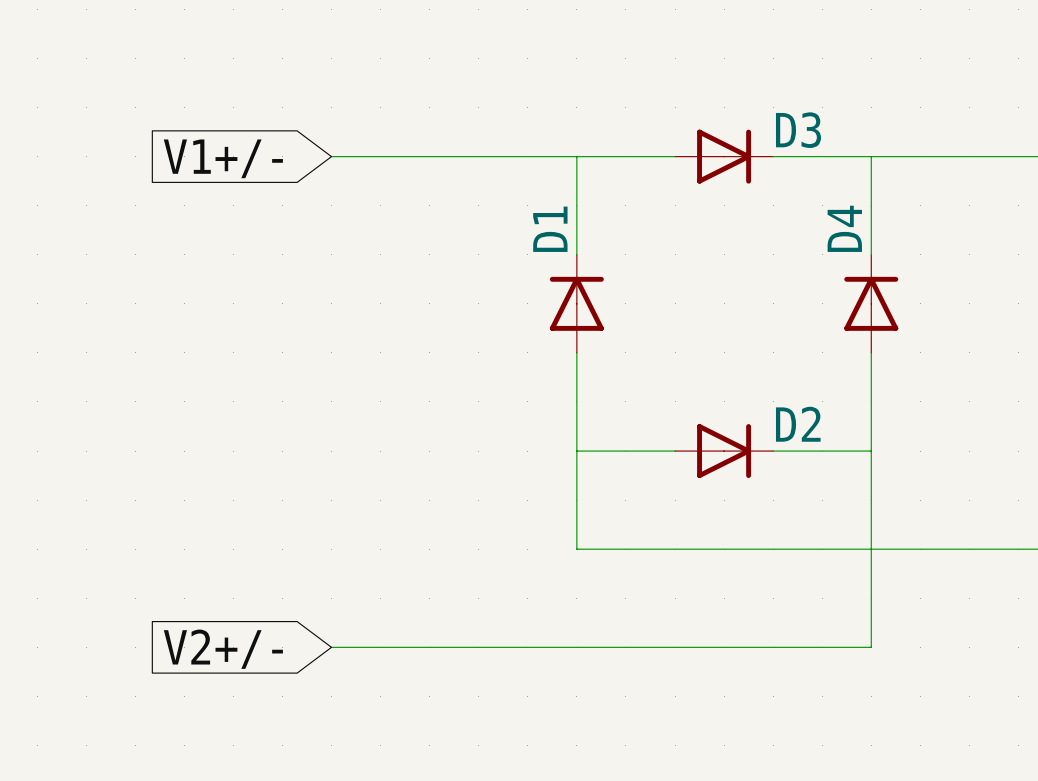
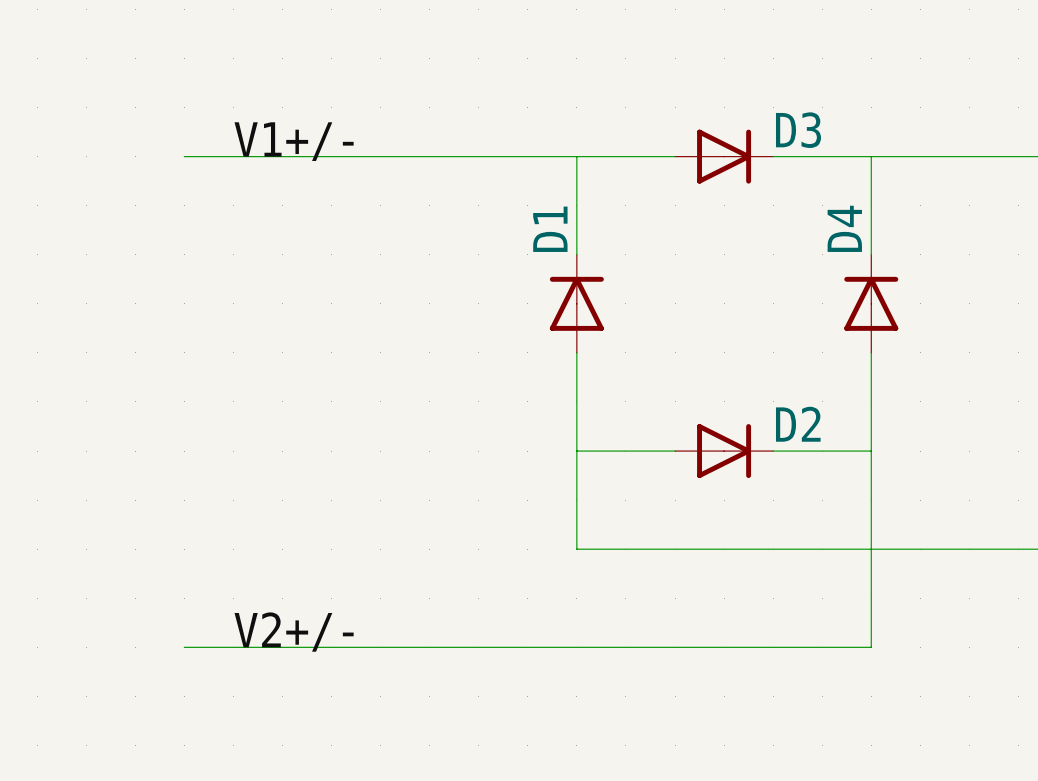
label: none -> V1+/- (294, 141)
wire: none -> (184, 156) (331, 156)
global label: V1+/- (223, 158) -> none
label: none -> V2+/- (294, 632)
wire: none -> (184, 647) (331, 647)
global label: V2+/- (223, 649) -> none

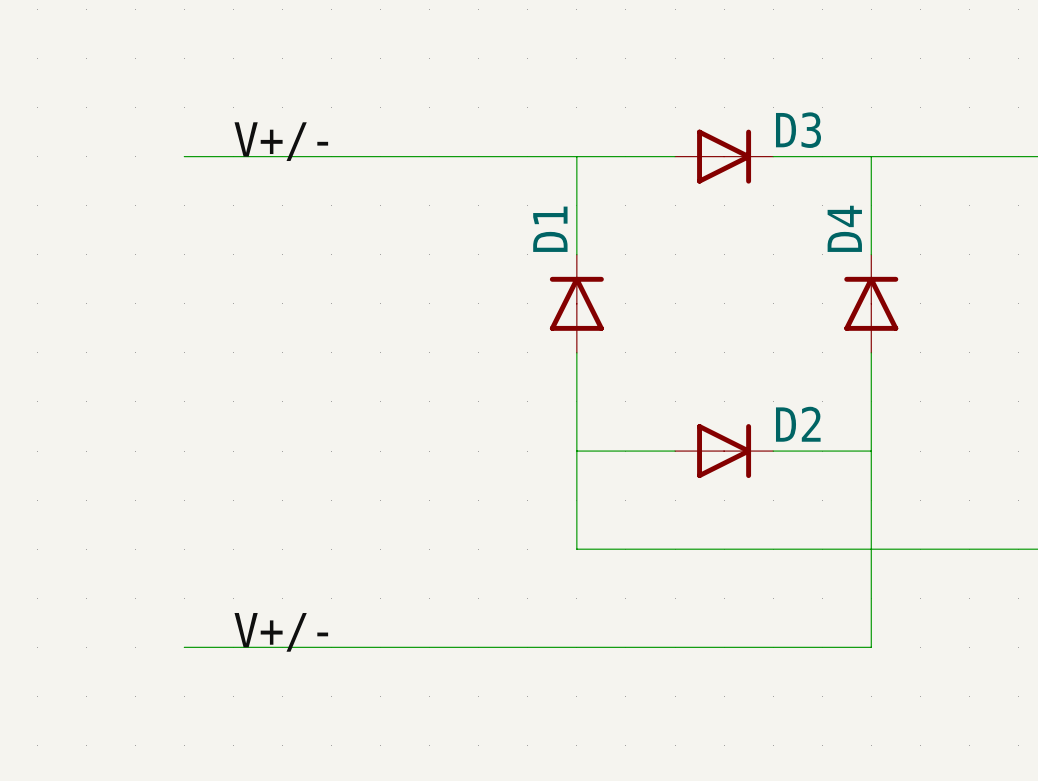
label: V1+/- (294, 141) -> V+/- (281, 141)
label: V2+/- (294, 632) -> V+/- (281, 632)

